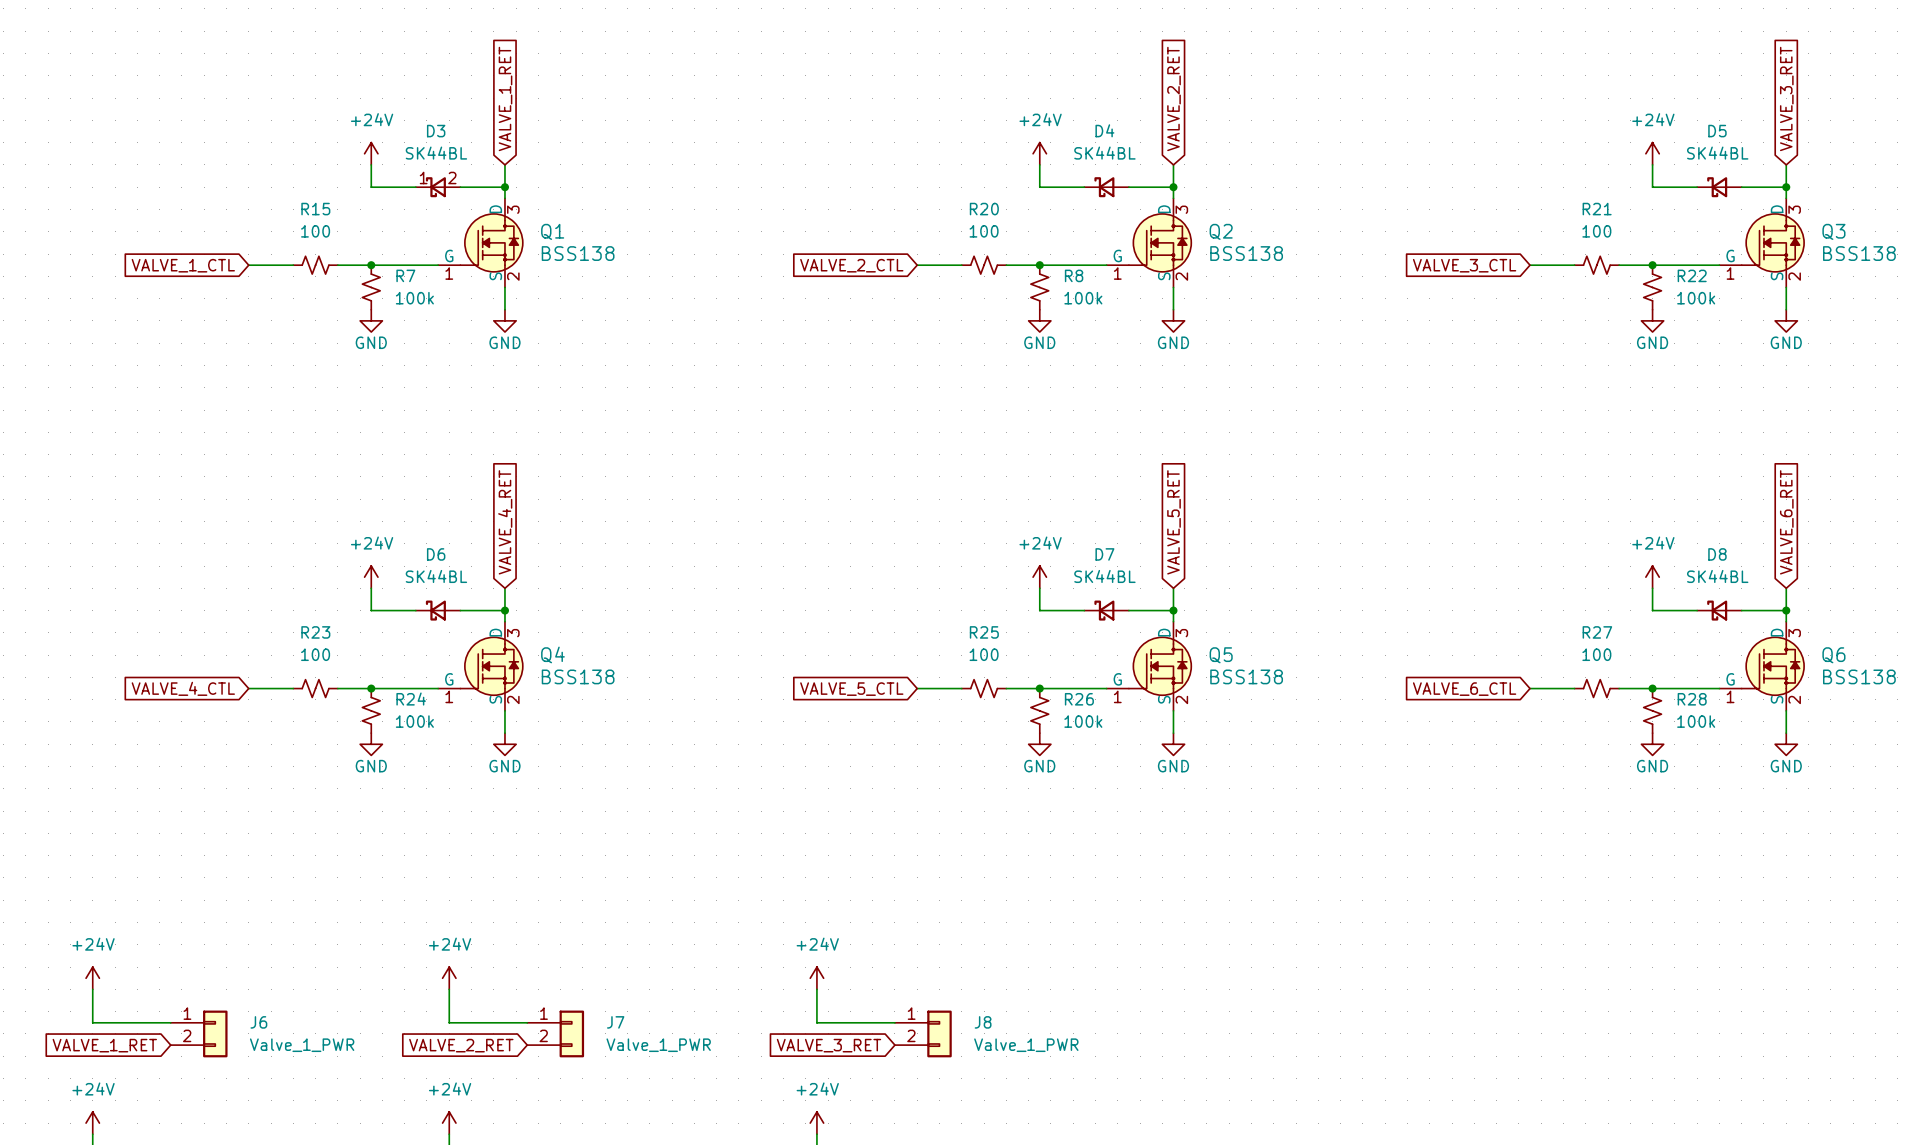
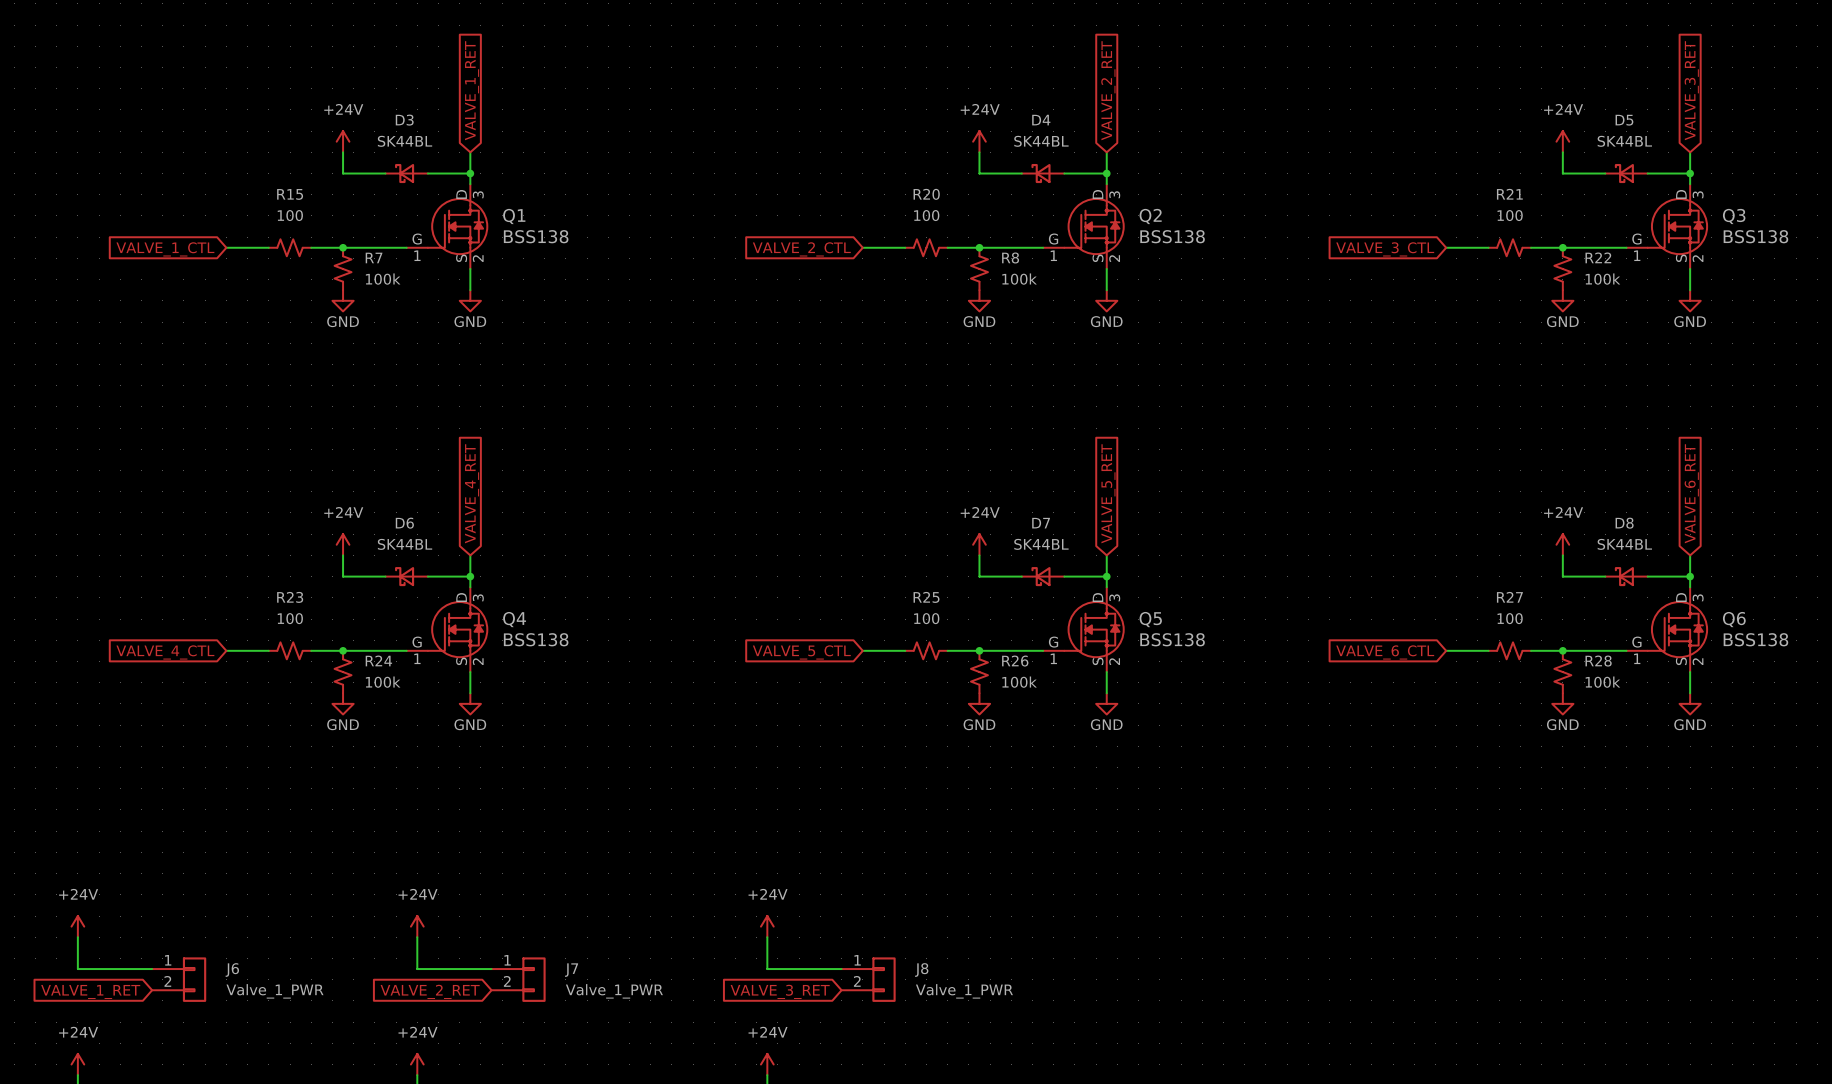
D3 pin number: 1 (423, 178) -> none
D3 pin number: 2 (452, 178) -> none

